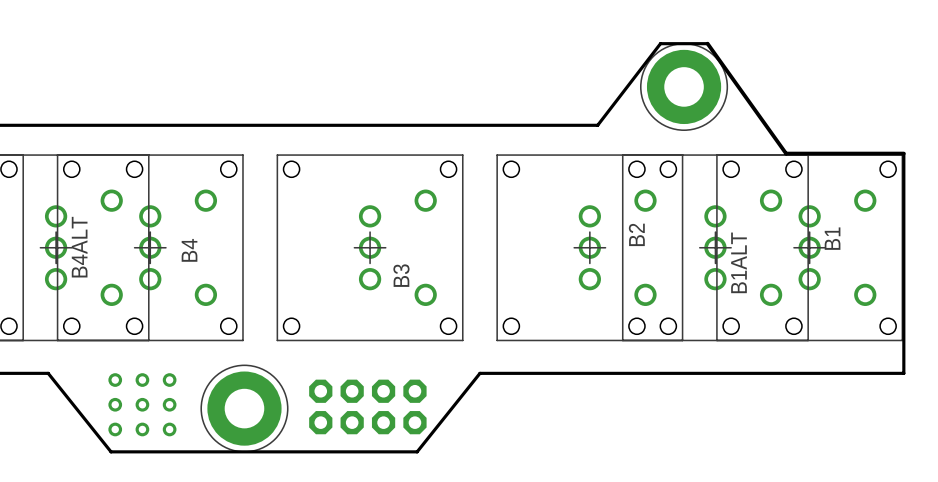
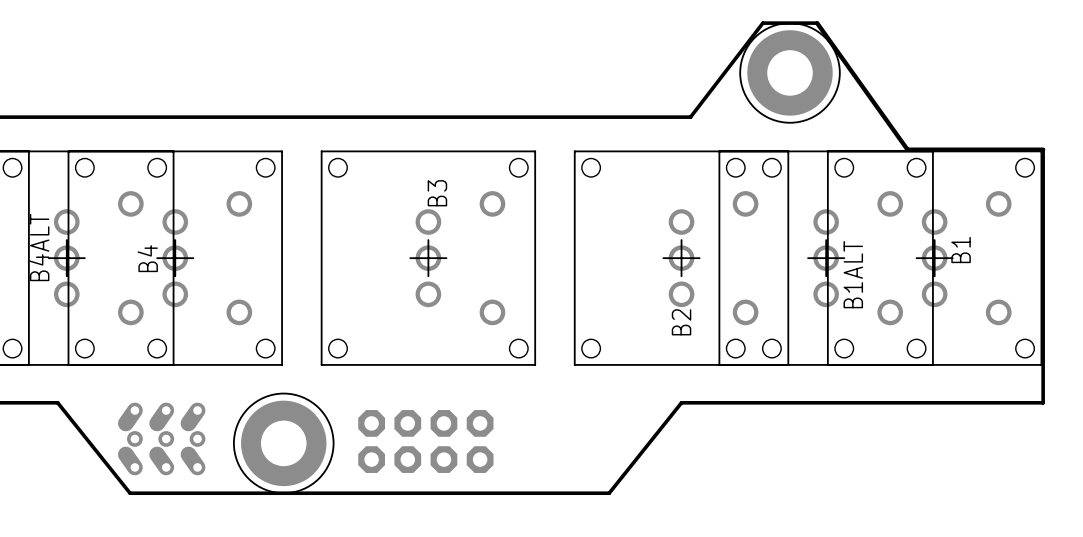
B2 name position: B2 (636, 234) -> B2 (681, 322)
B4ALT name position: B4ALT (79, 247) -> B4ALT (39, 247)
B4 name position: B4 (189, 250) -> B4 (147, 258)
B3 name position: B3 (401, 275) -> B3 (437, 193)
part footprint: [108, 373, 177, 437] -> [117, 402, 206, 476]
board edge: (589, 373) (479, 373) (417, 451) -> (681, 402) (609, 493) (482, 493)

